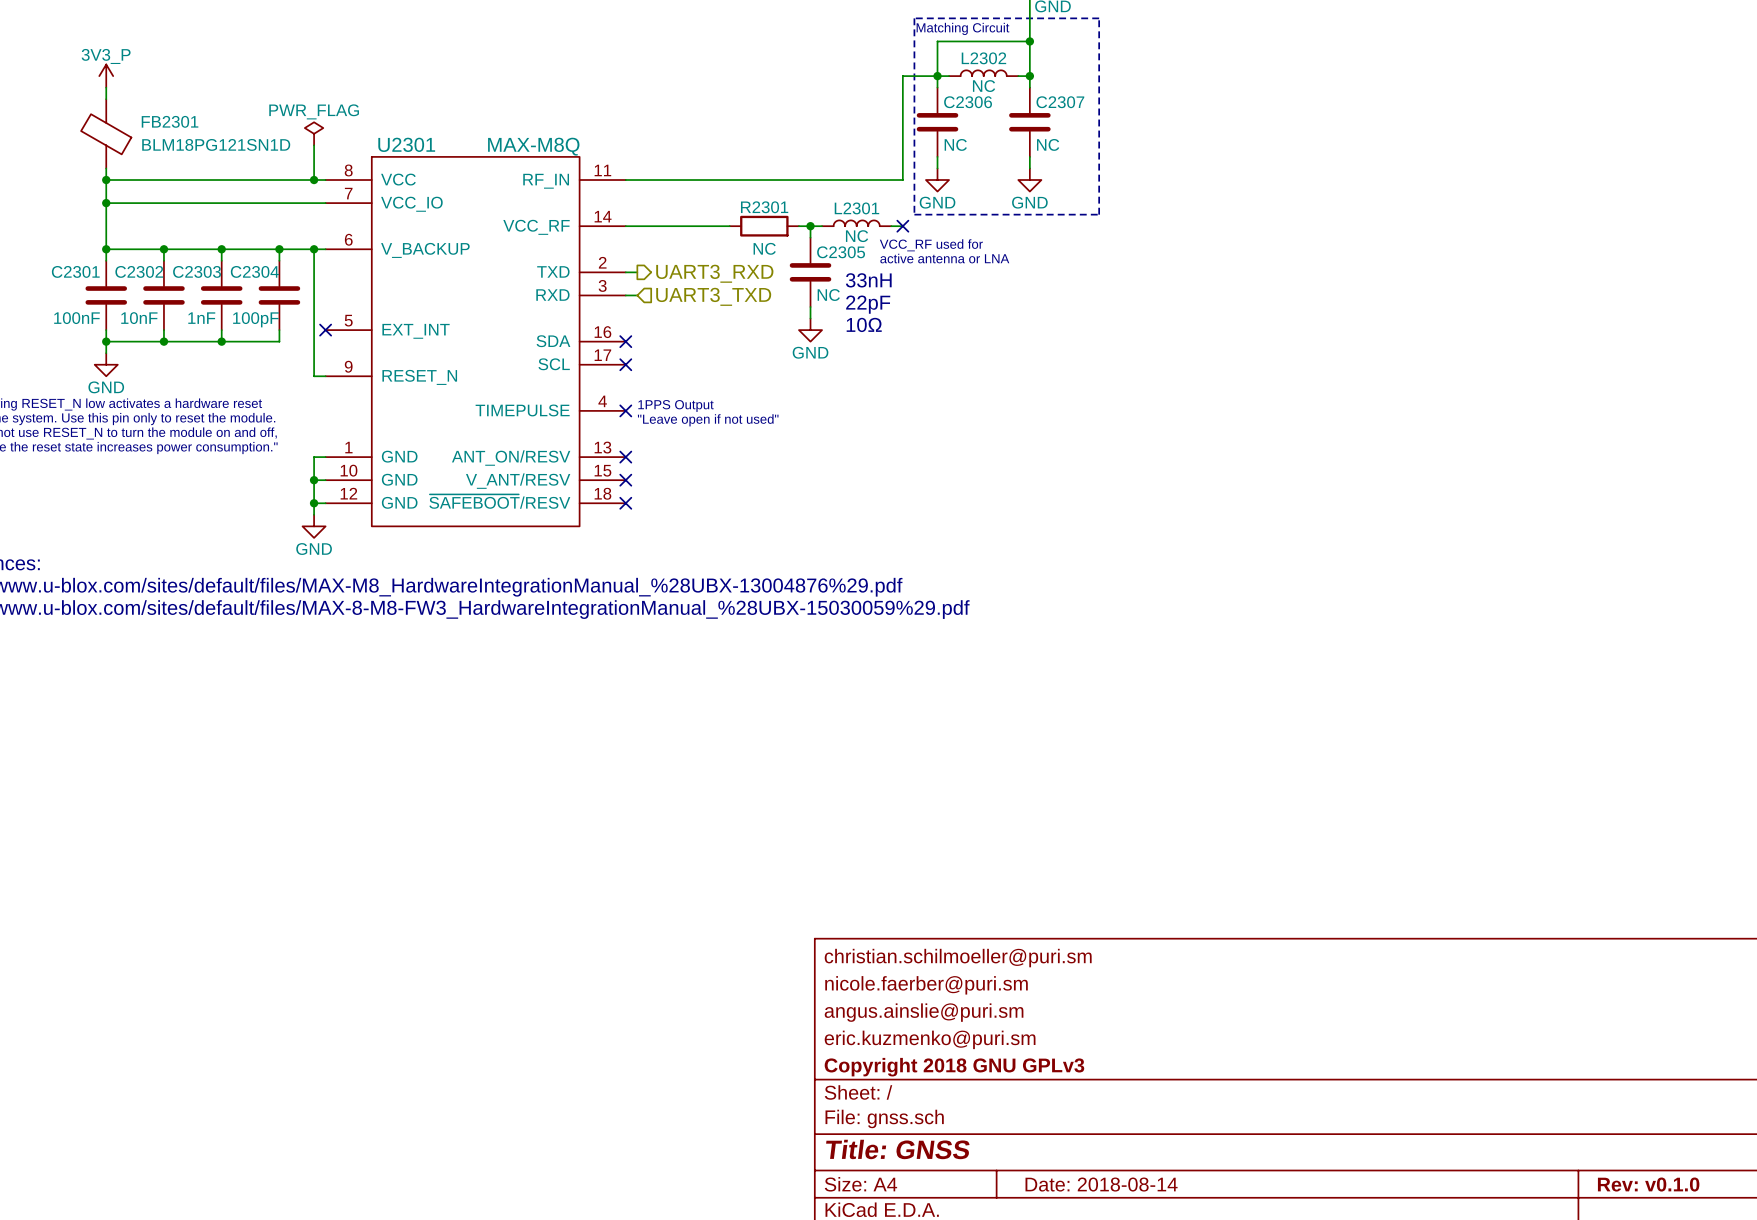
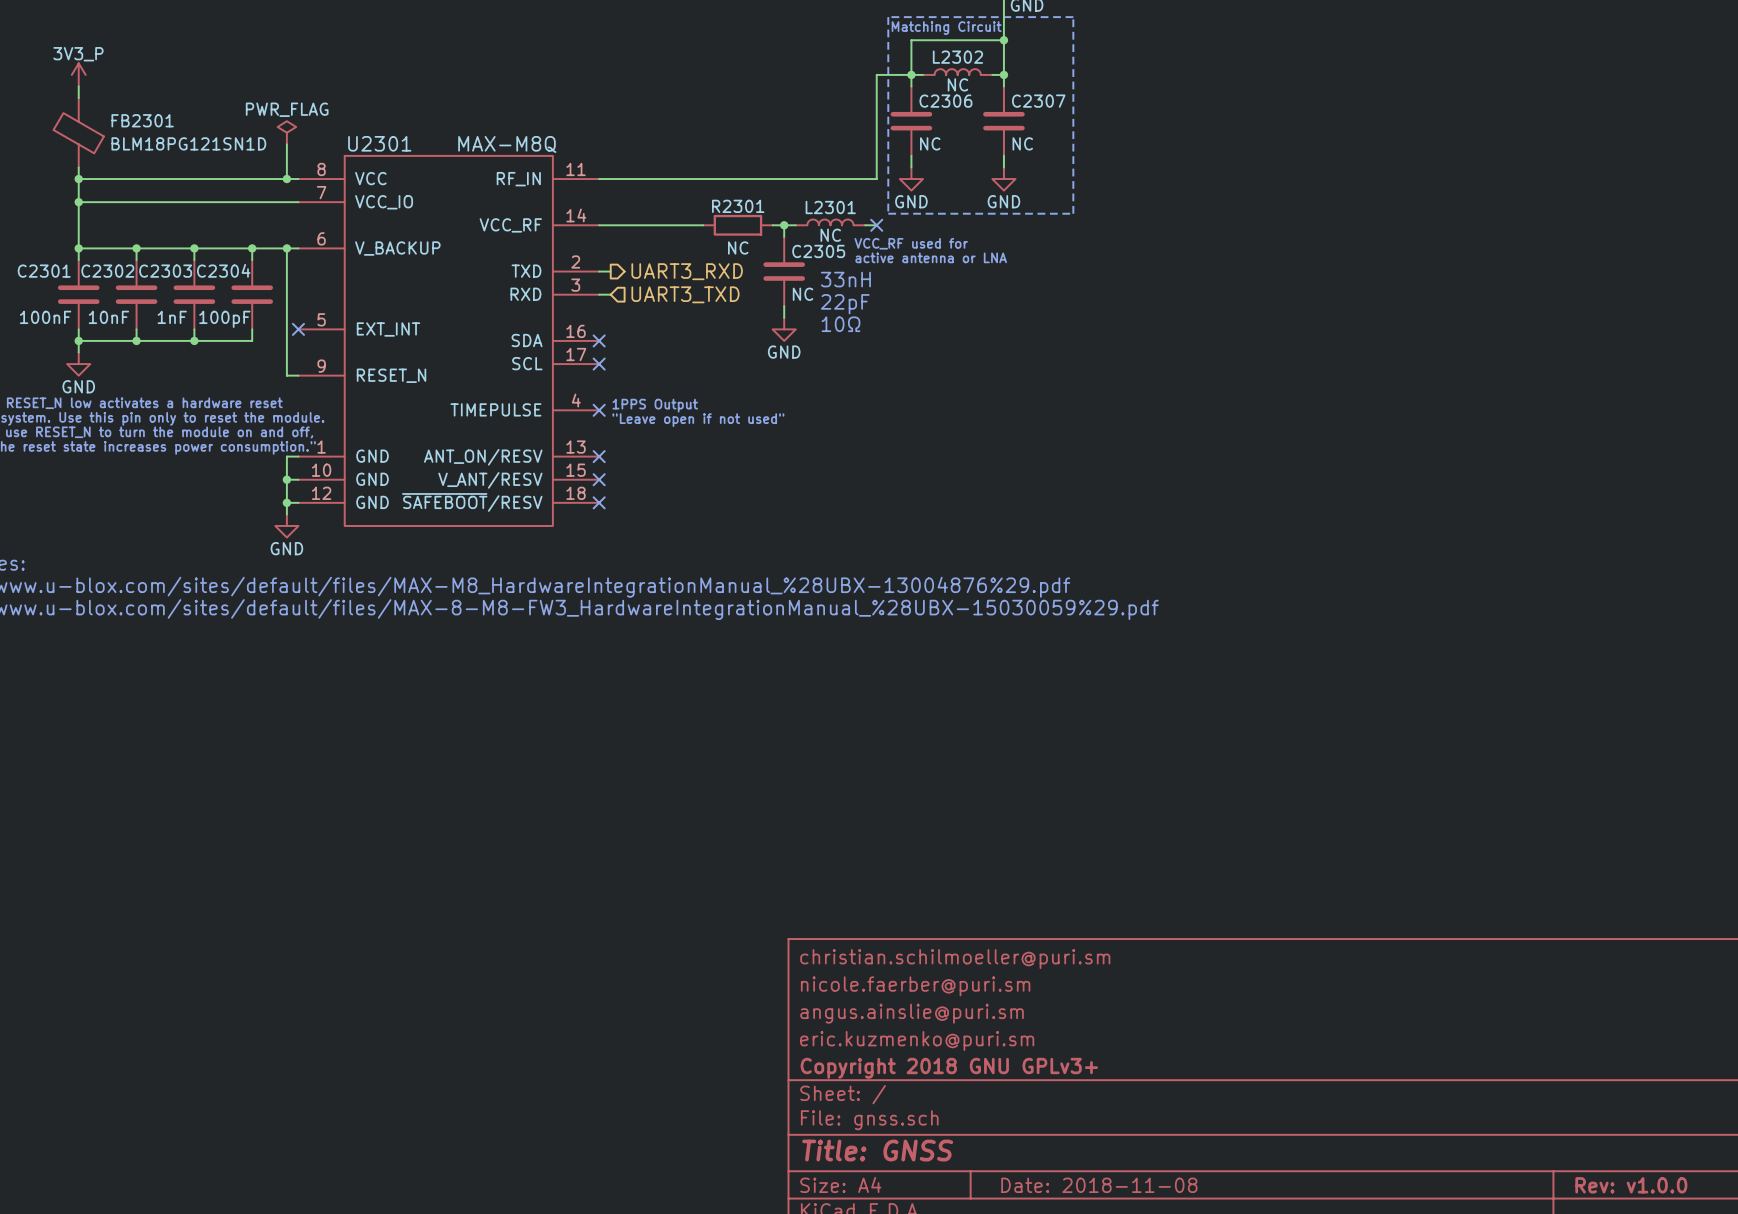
title block: Copyright 2018 GNU GPLv3 (954, 1067) -> Copyright 2018 GNU GPLv3+ (949, 1068)
title block: Date: 2018-08-14 (1101, 1184) -> Date: 2018-11-08 (1099, 1185)
title block: Rev: v0.1.0 (1648, 1184) -> Rev: v1.0.0 (1631, 1185)

